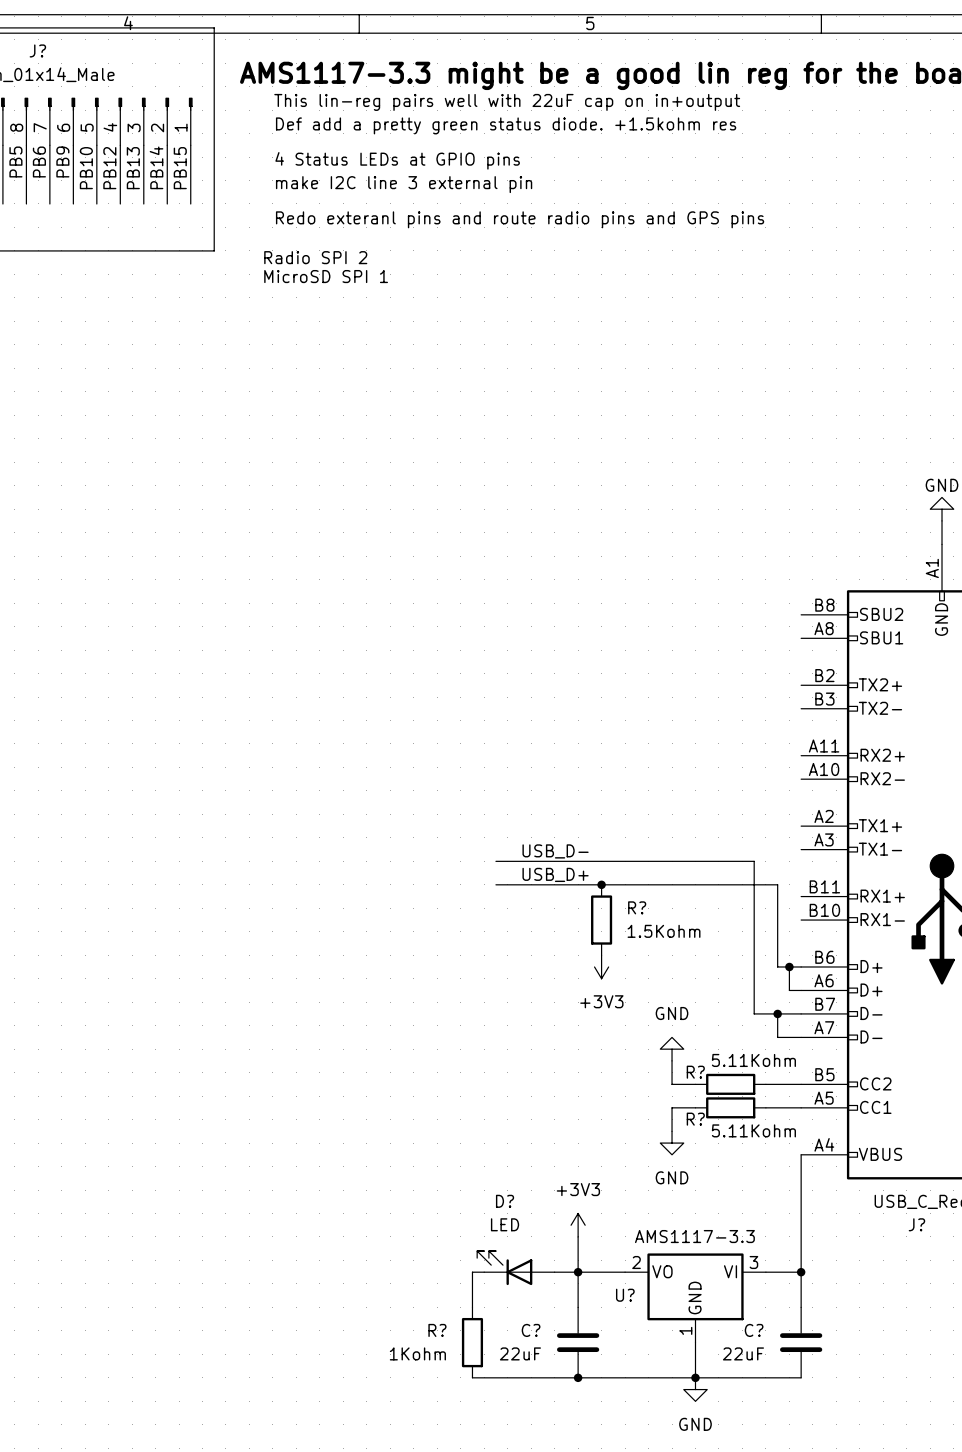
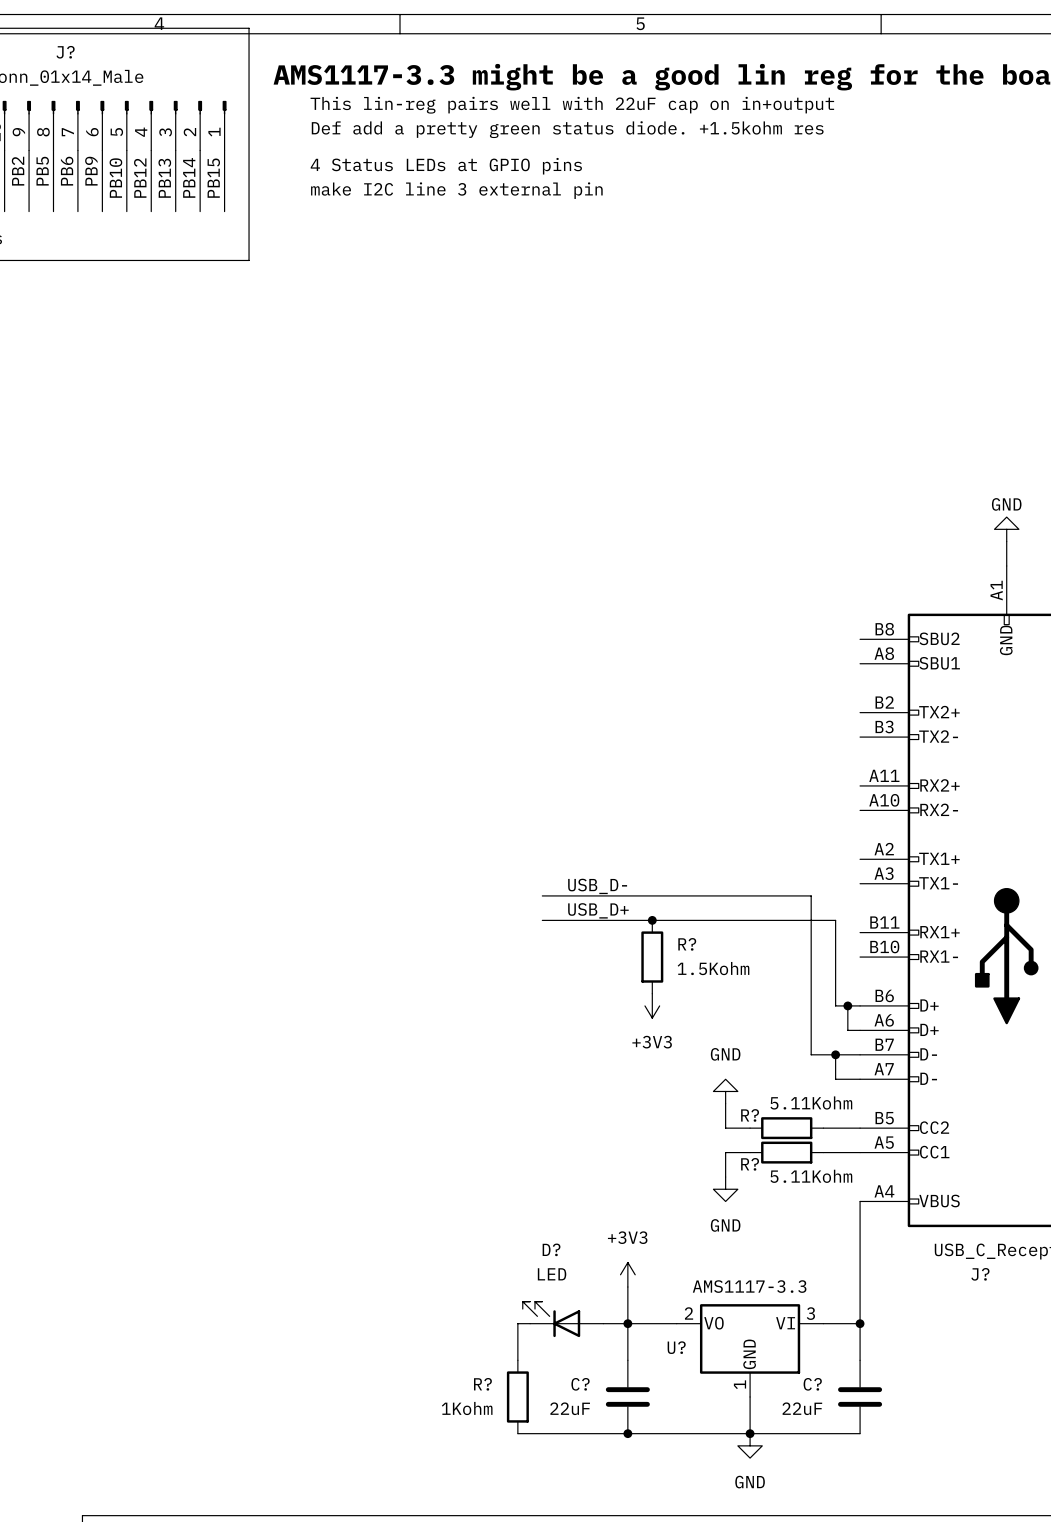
text: Redo exteranl pins and route radio pins and GPS pins (520, 219) -> none
text: Radio SPI 2 (315, 257) -> none
text: MicroSD SPI 1 (326, 276) -> none

